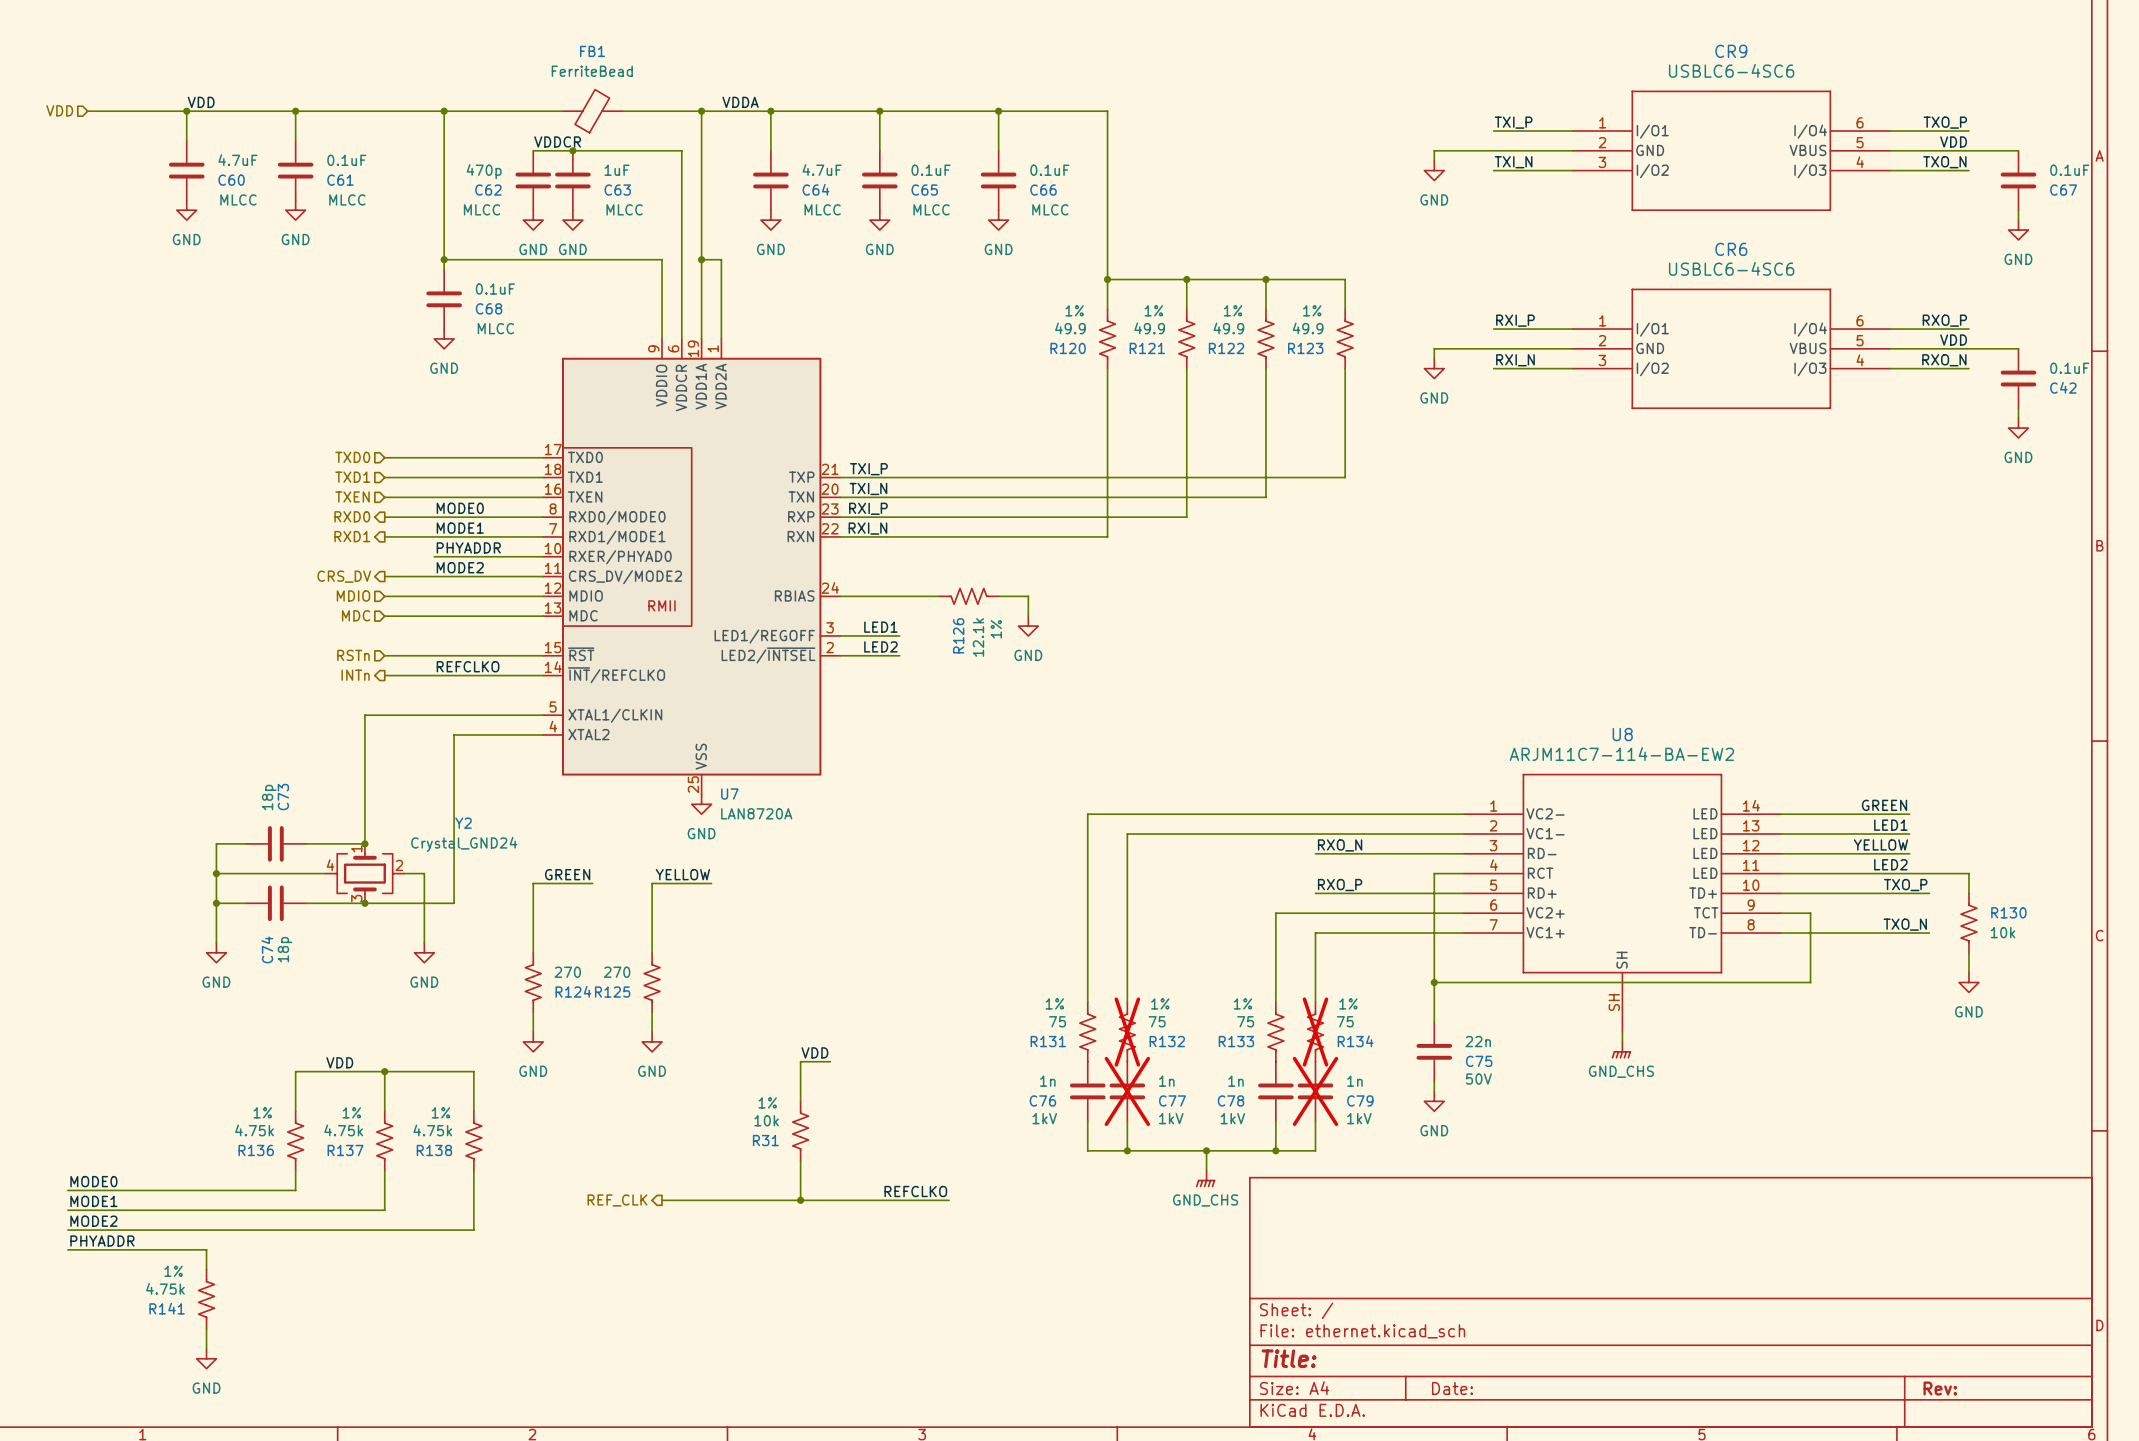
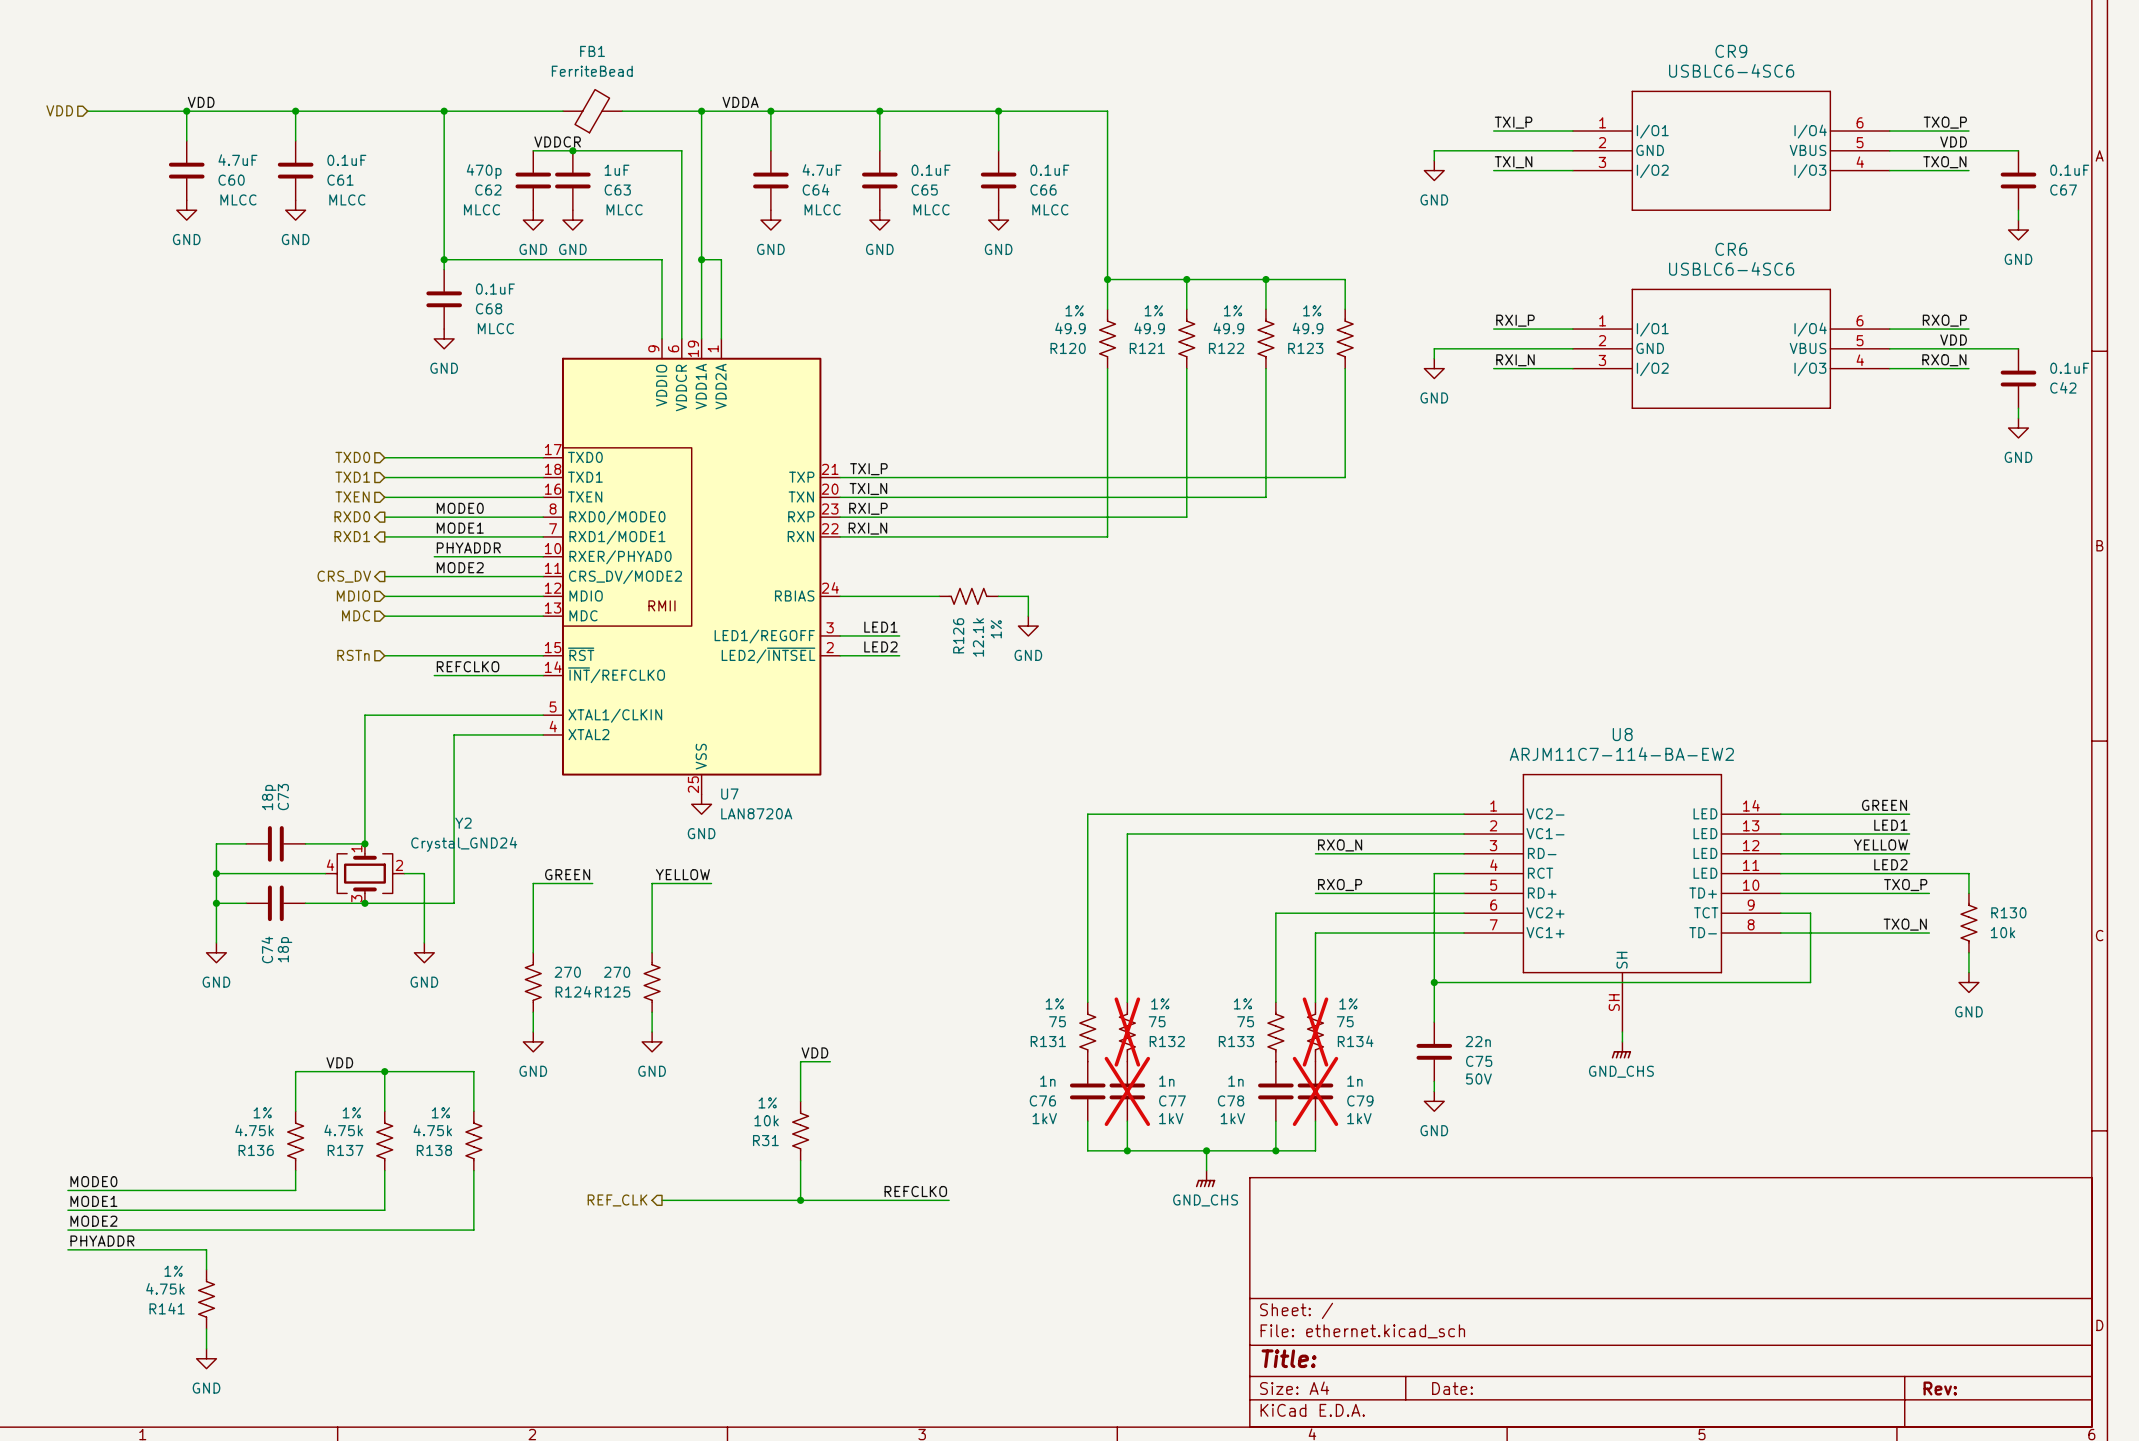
hierarchical label: INTn (355, 675) -> none
wire: (384, 675) (434, 675) -> none

